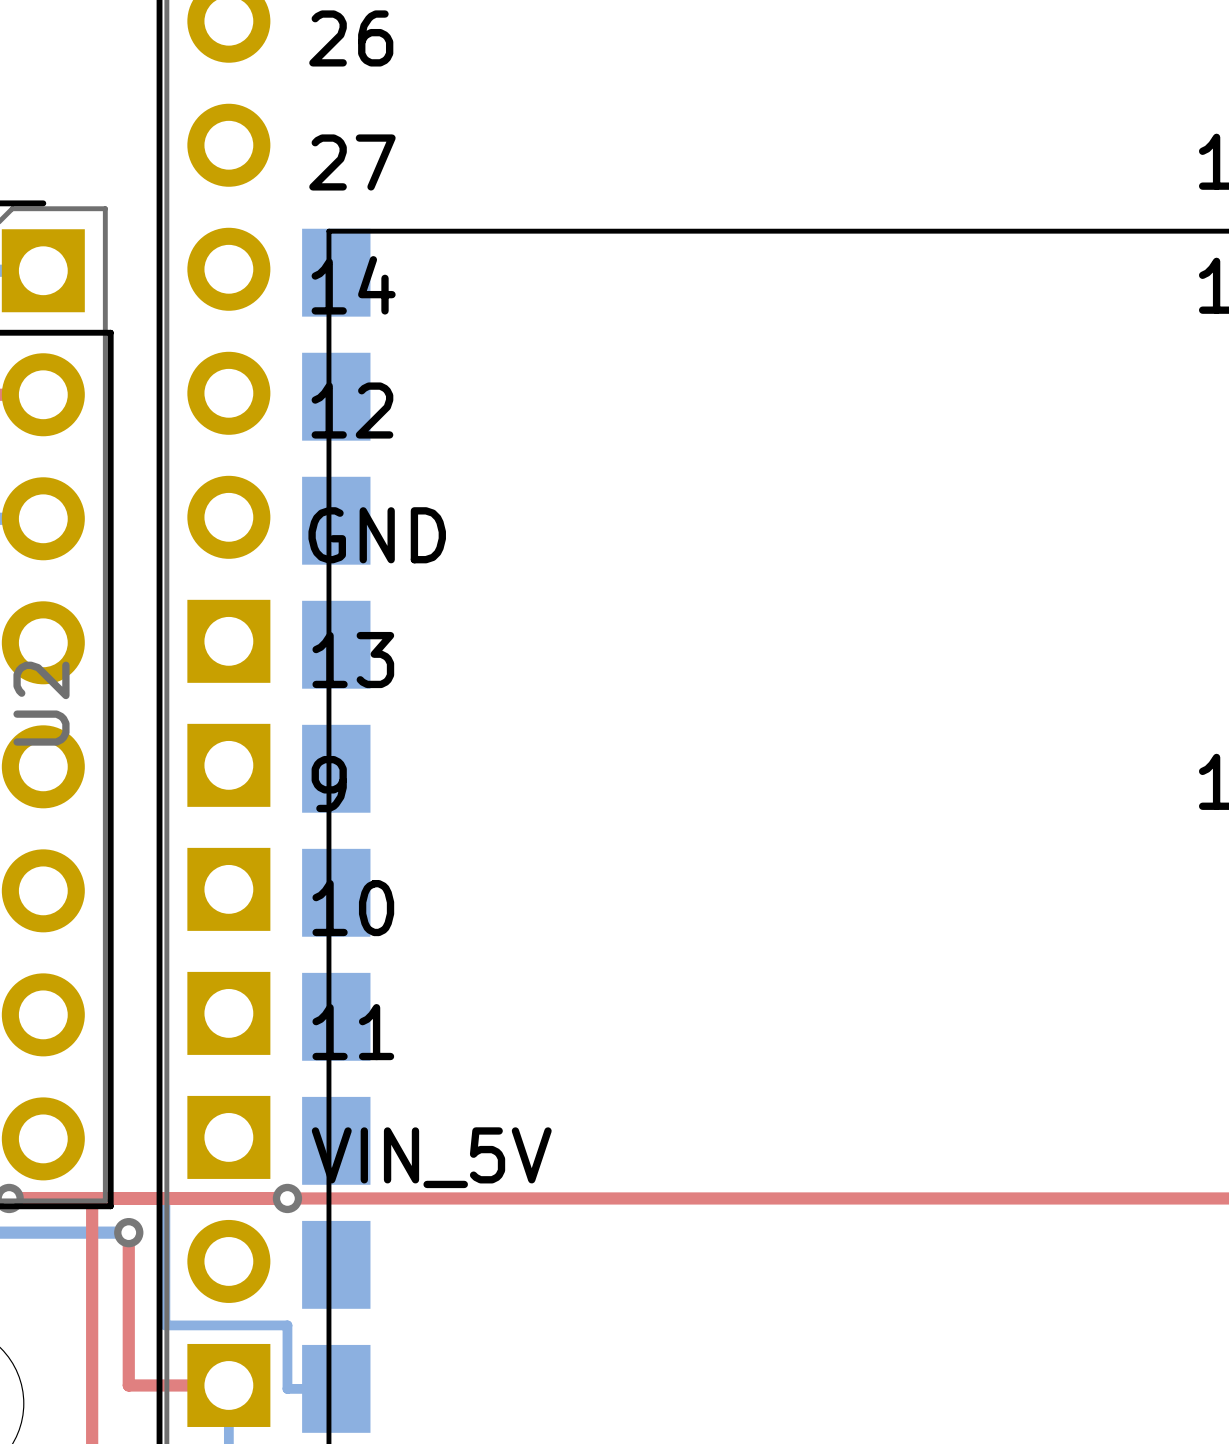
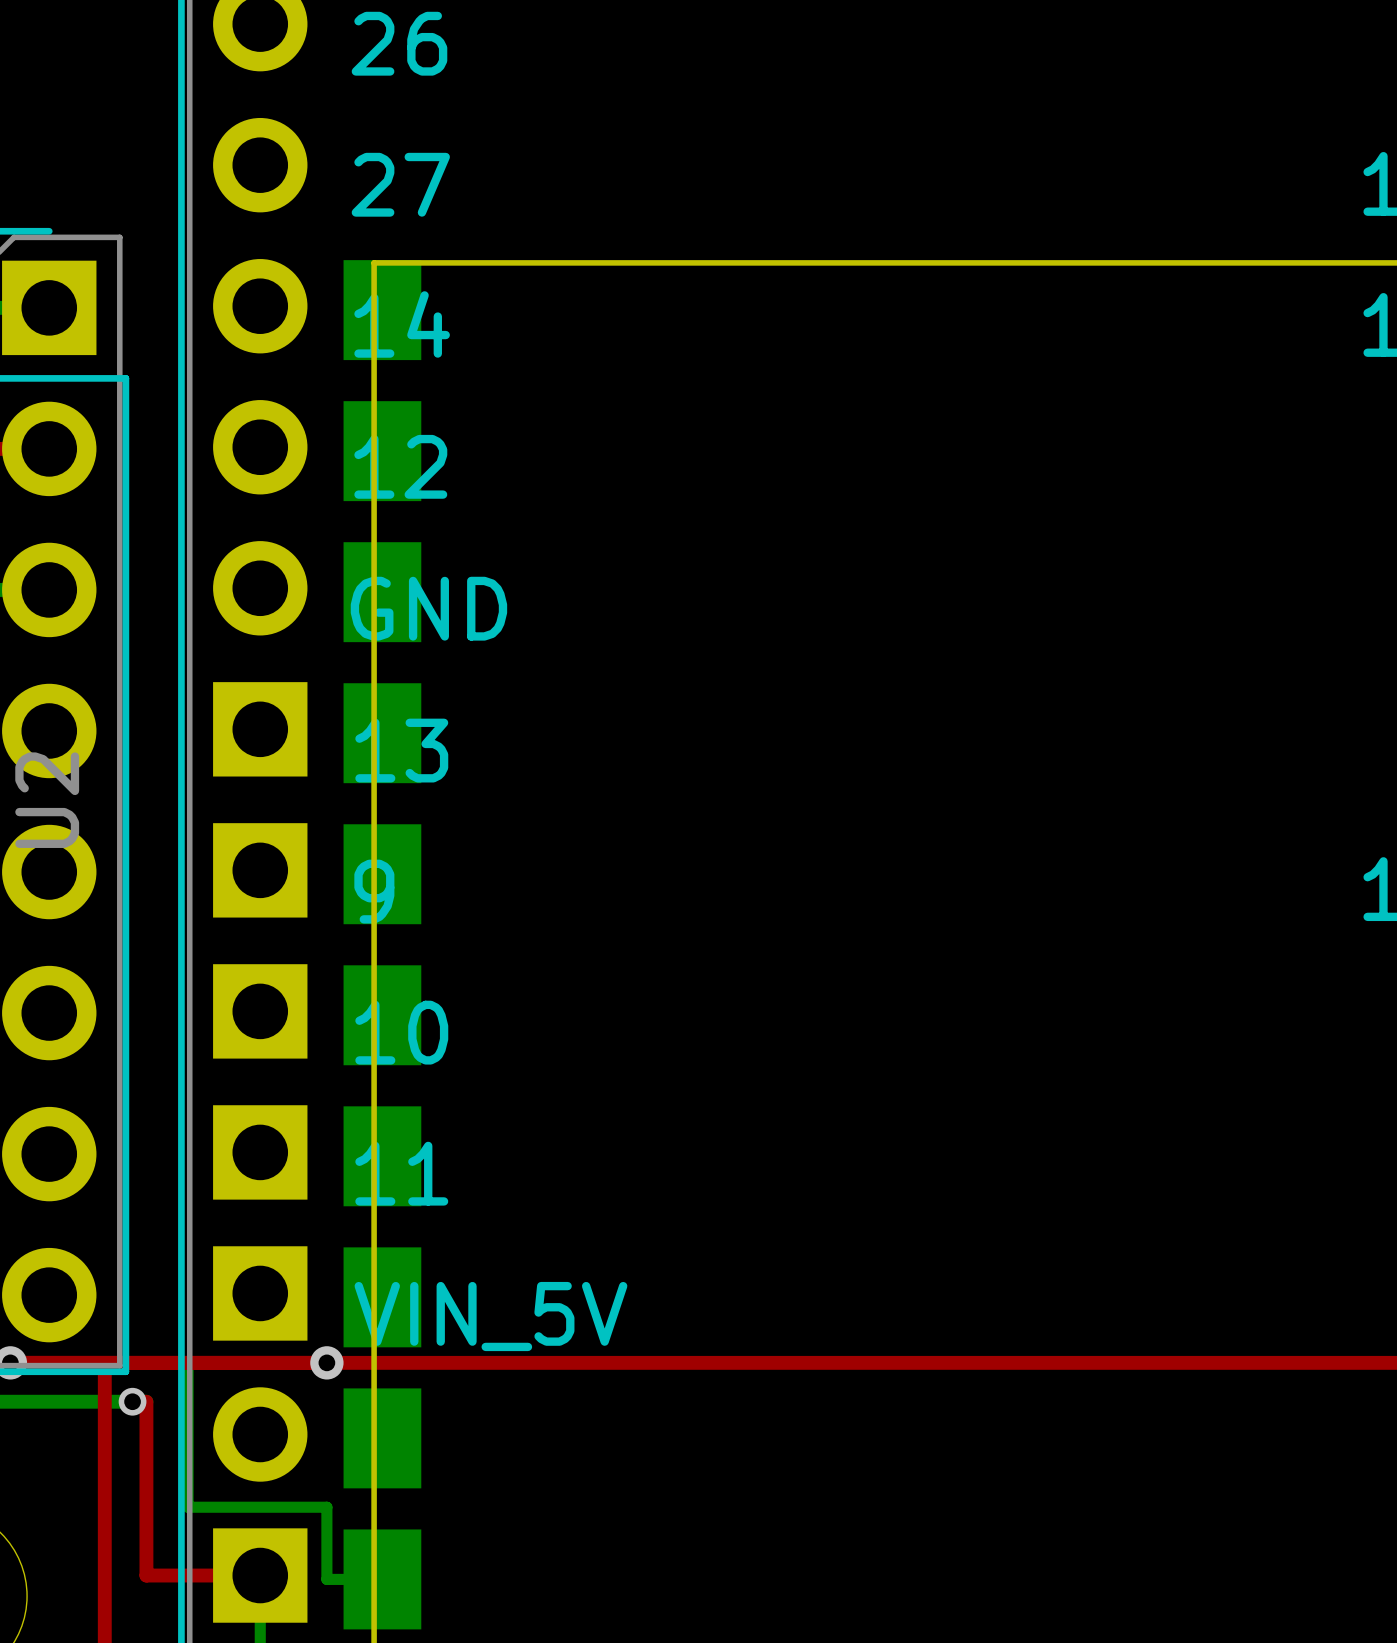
via position: (128, 1232) -> (132, 1401)

